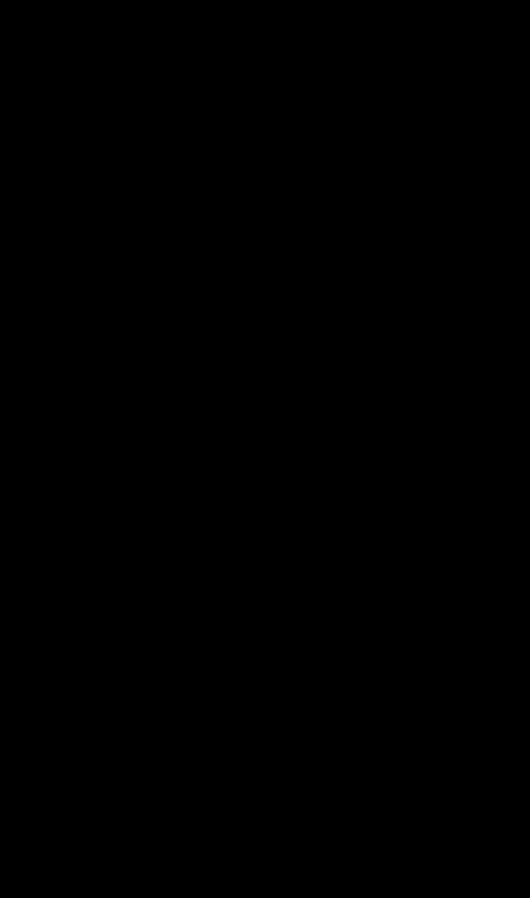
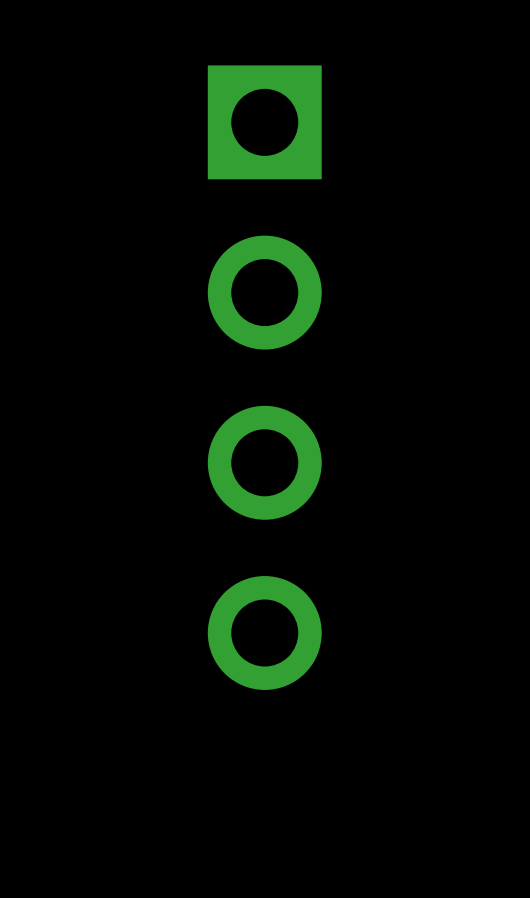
part: none -> (264, 377)

